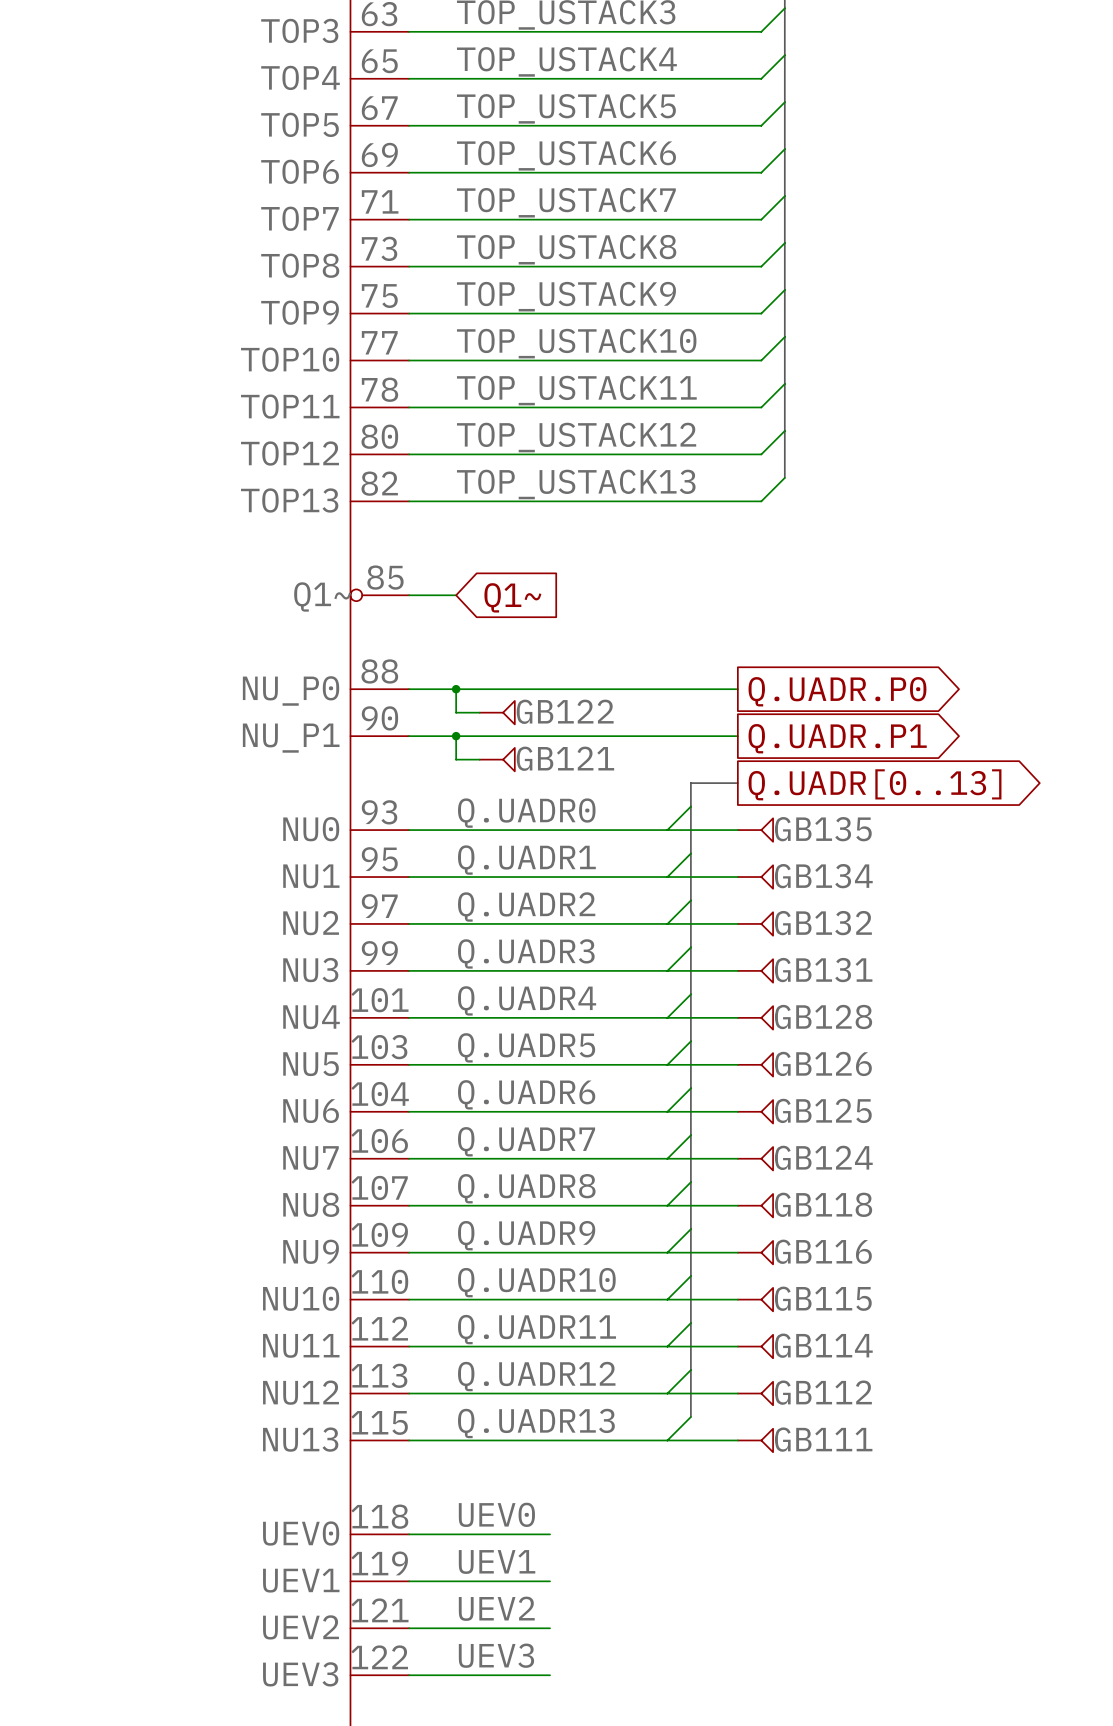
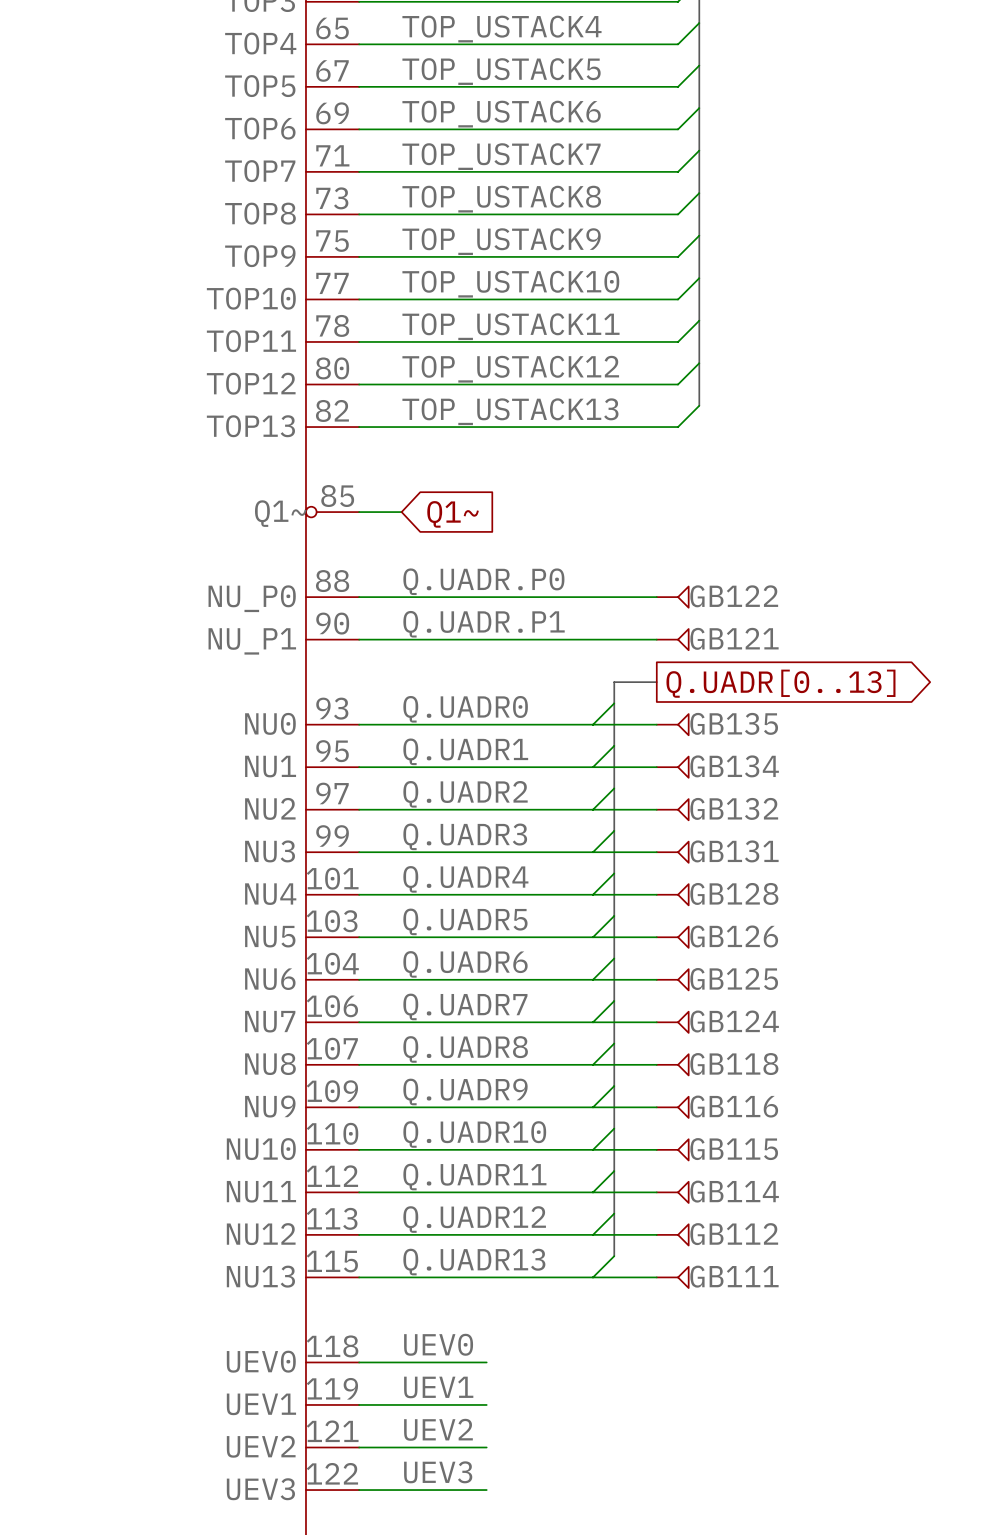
label: none -> Q.UADR.P0 (483, 581)
wire: (456, 689) (456, 712) (479, 712) -> none
junction: (456, 689) -> none
global label: Q.UADR.P0 (837, 691) -> none
GB122 position: (497, 712) -> (673, 597)
label: none -> Q.UADR.P1 (484, 624)
wire: (456, 736) (456, 759) (479, 759) -> none
junction: (456, 736) -> none
global label: Q.UADR.P1 (837, 738) -> none
GB121 position: (497, 759) -> (673, 639)

